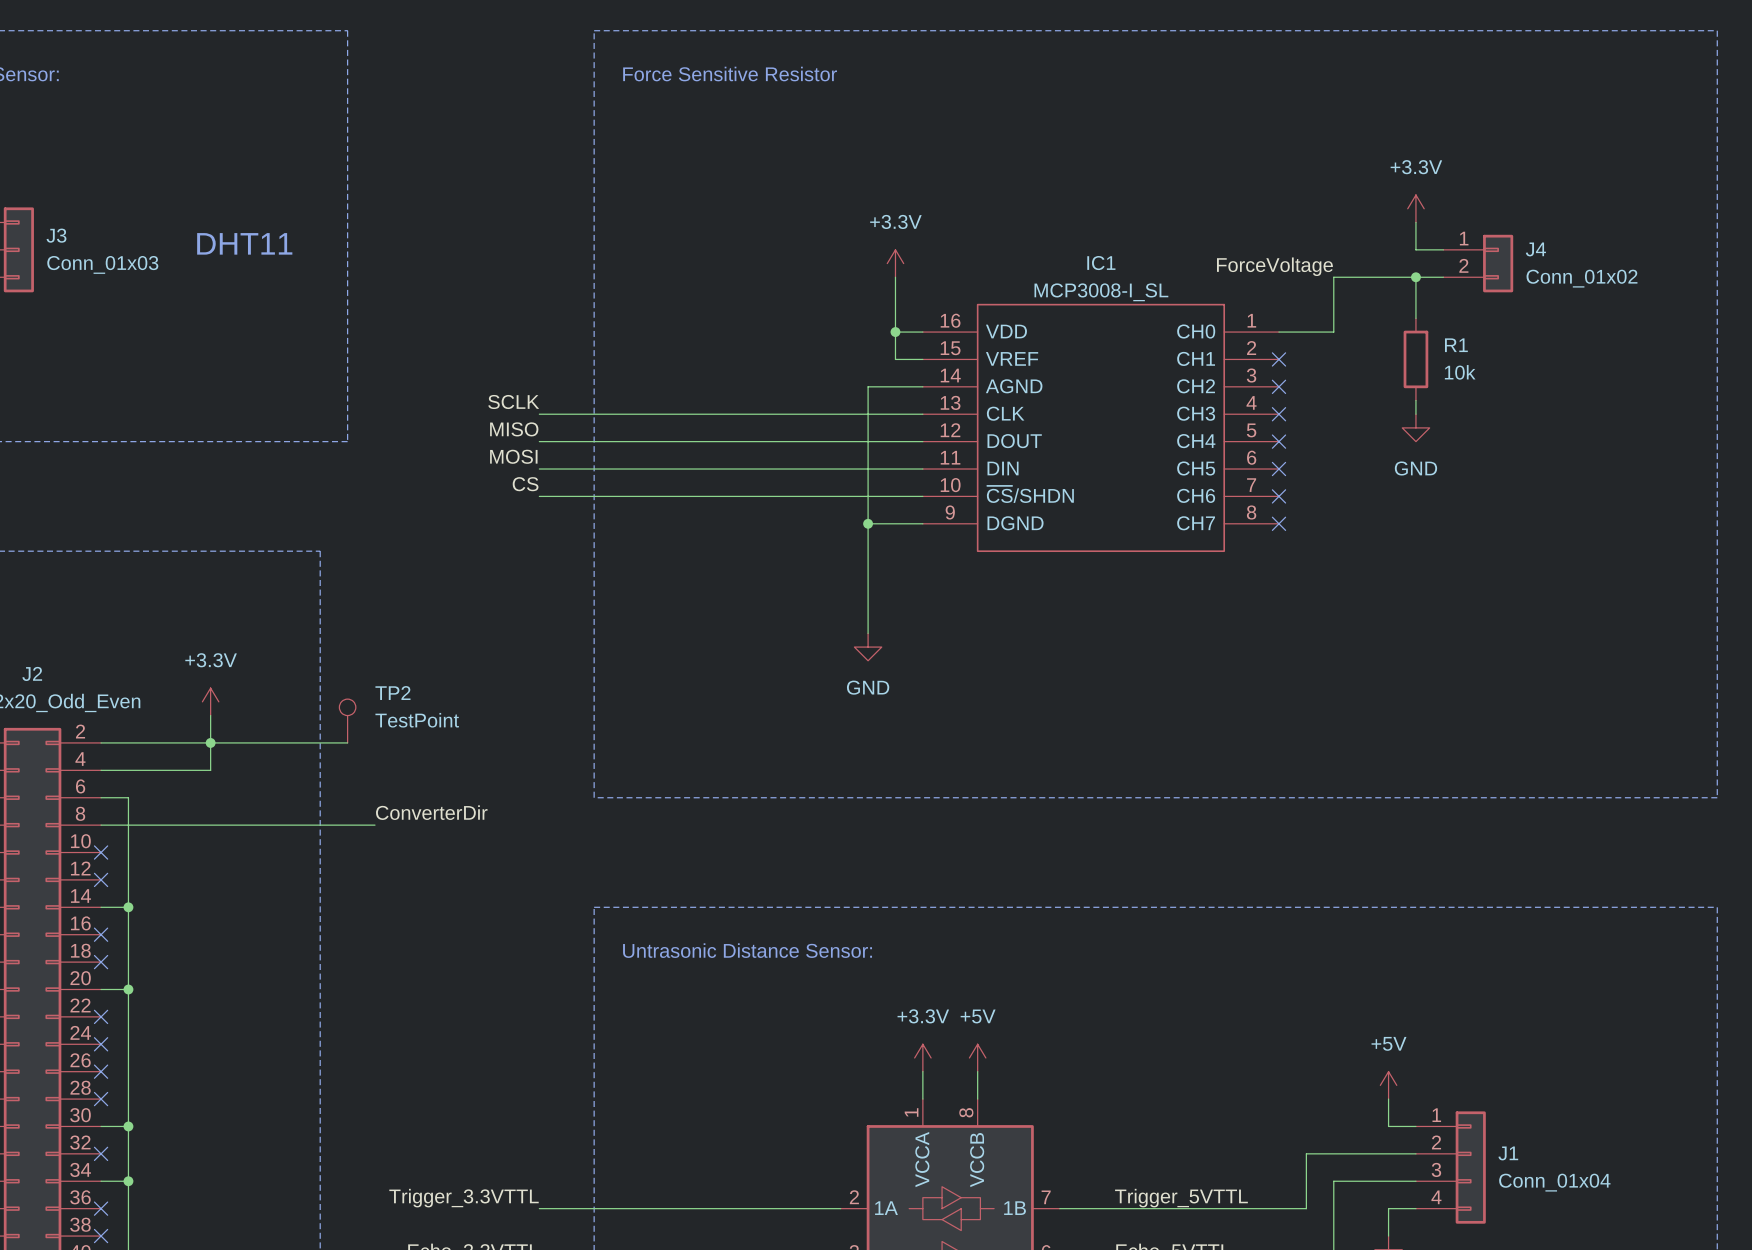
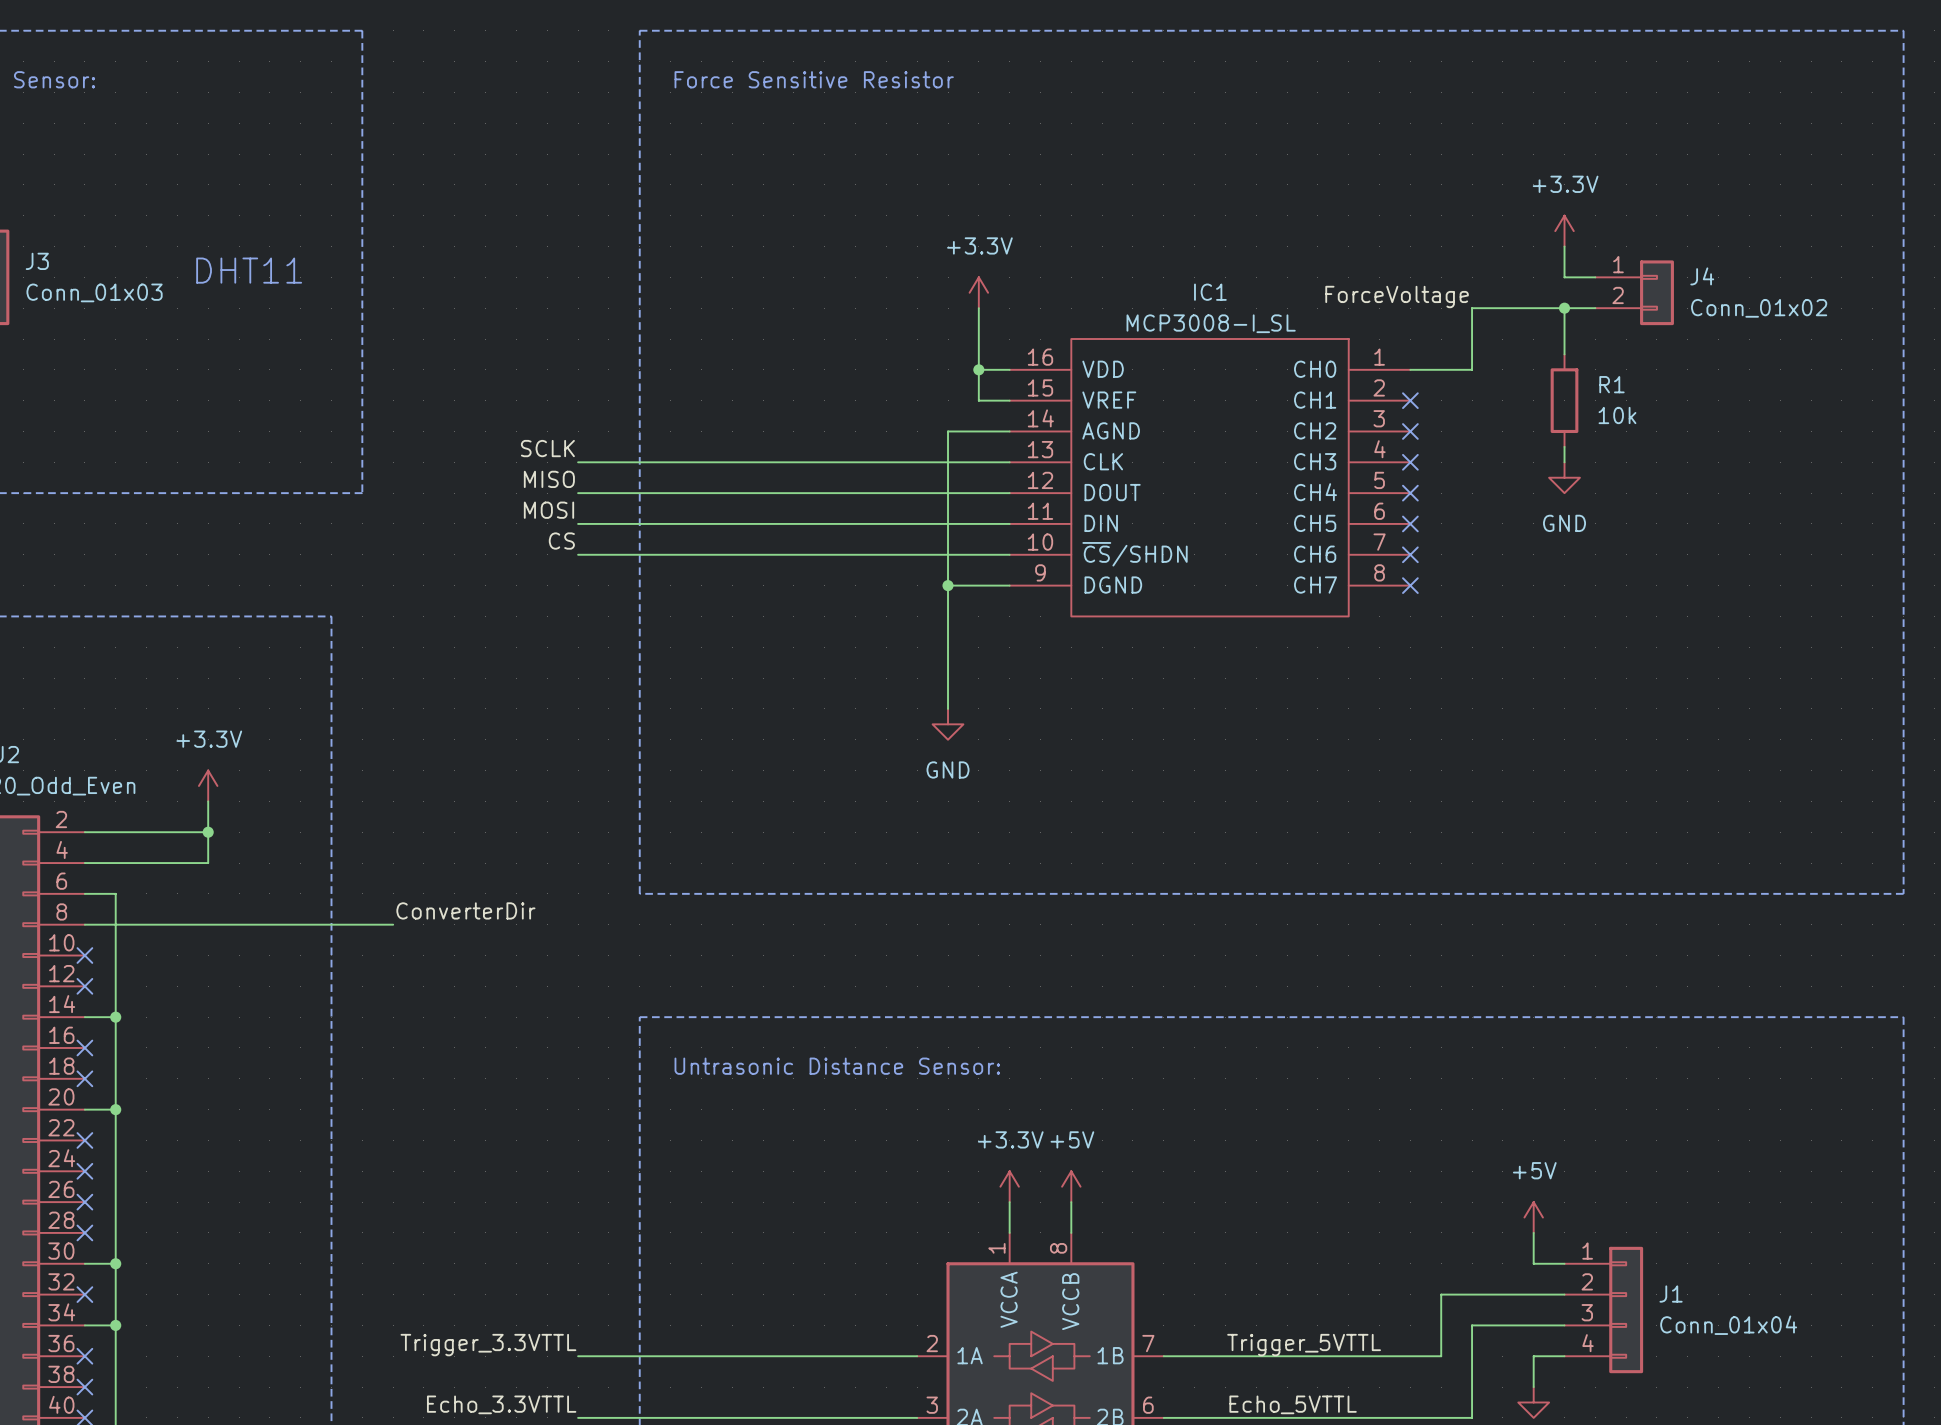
TP2: TestPoint (347, 721) -> none
wire: (210, 742) (347, 742) -> none

